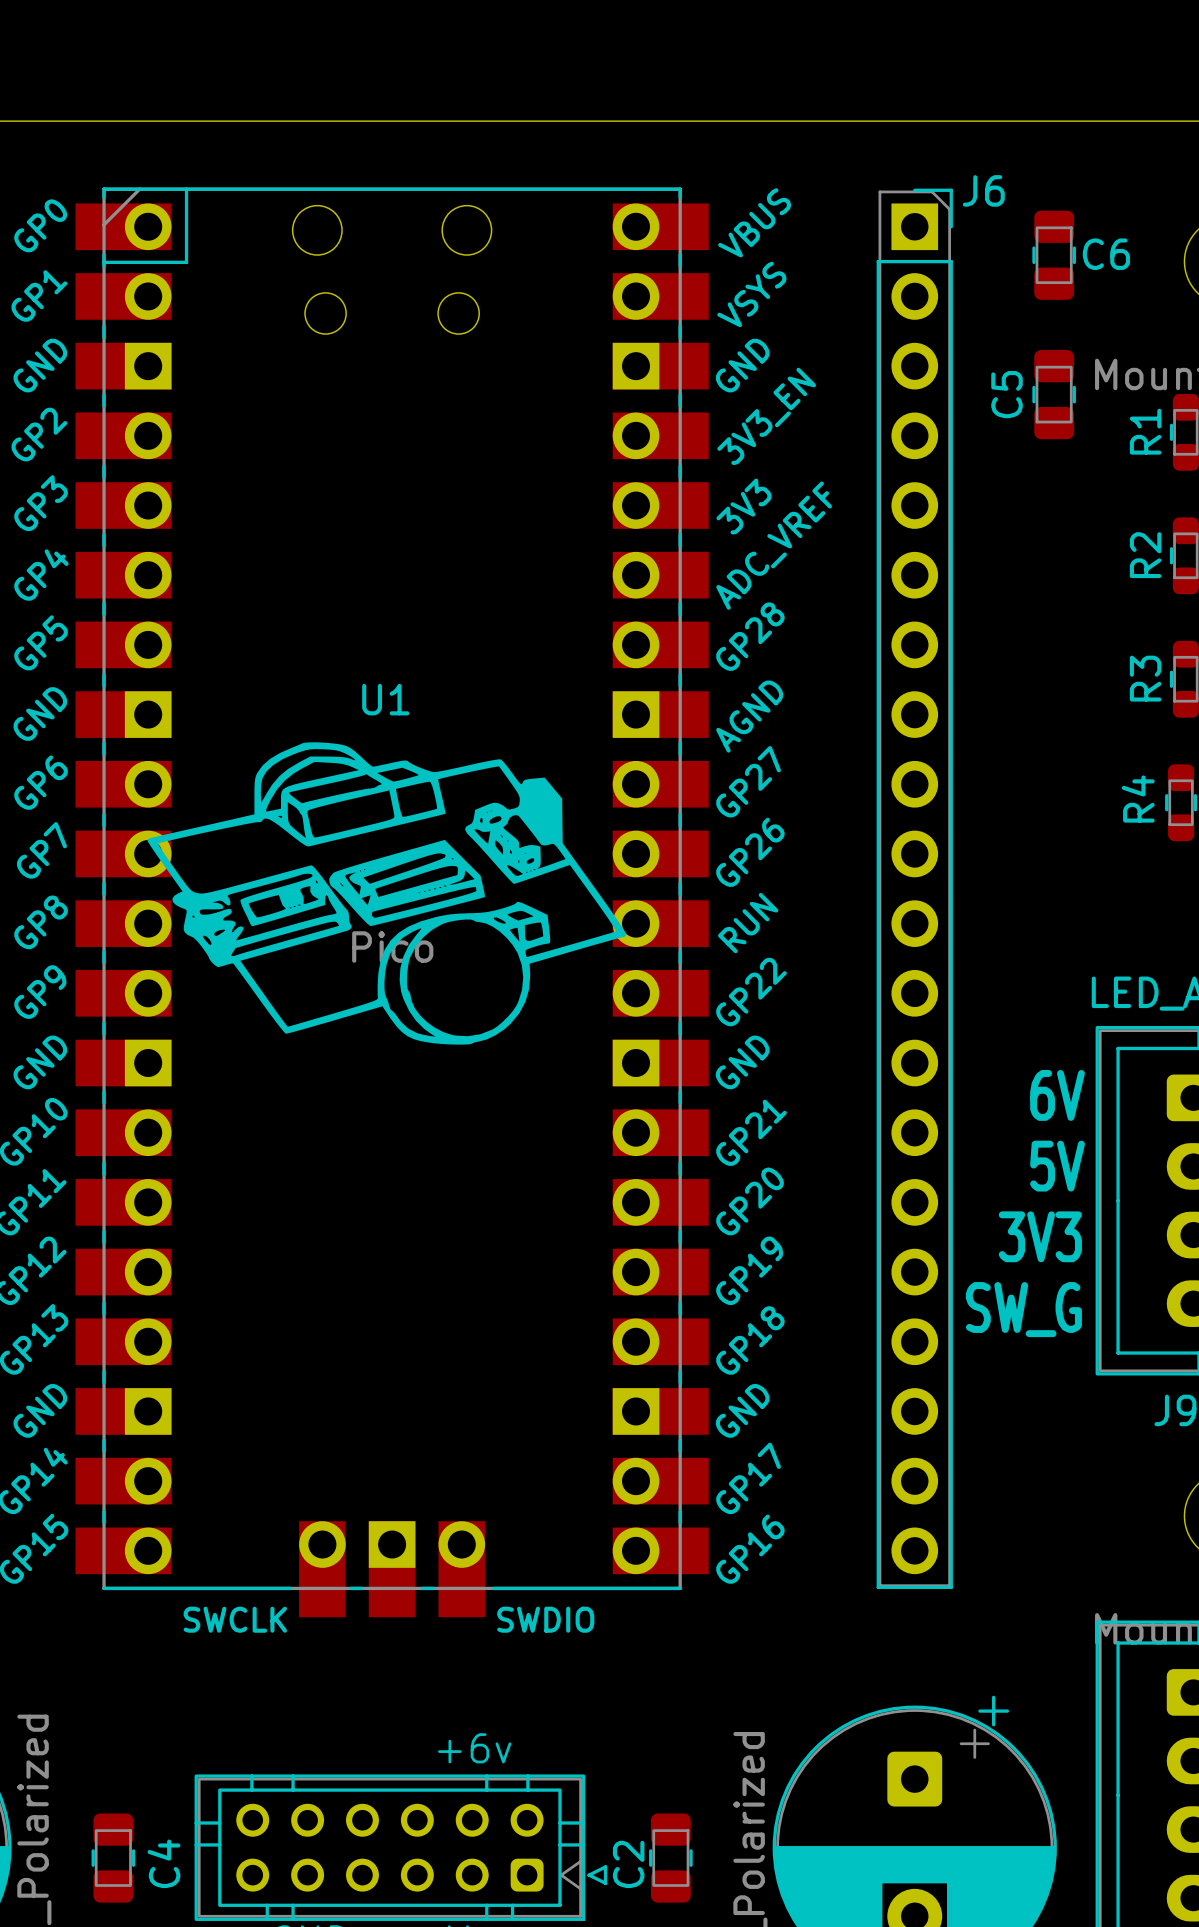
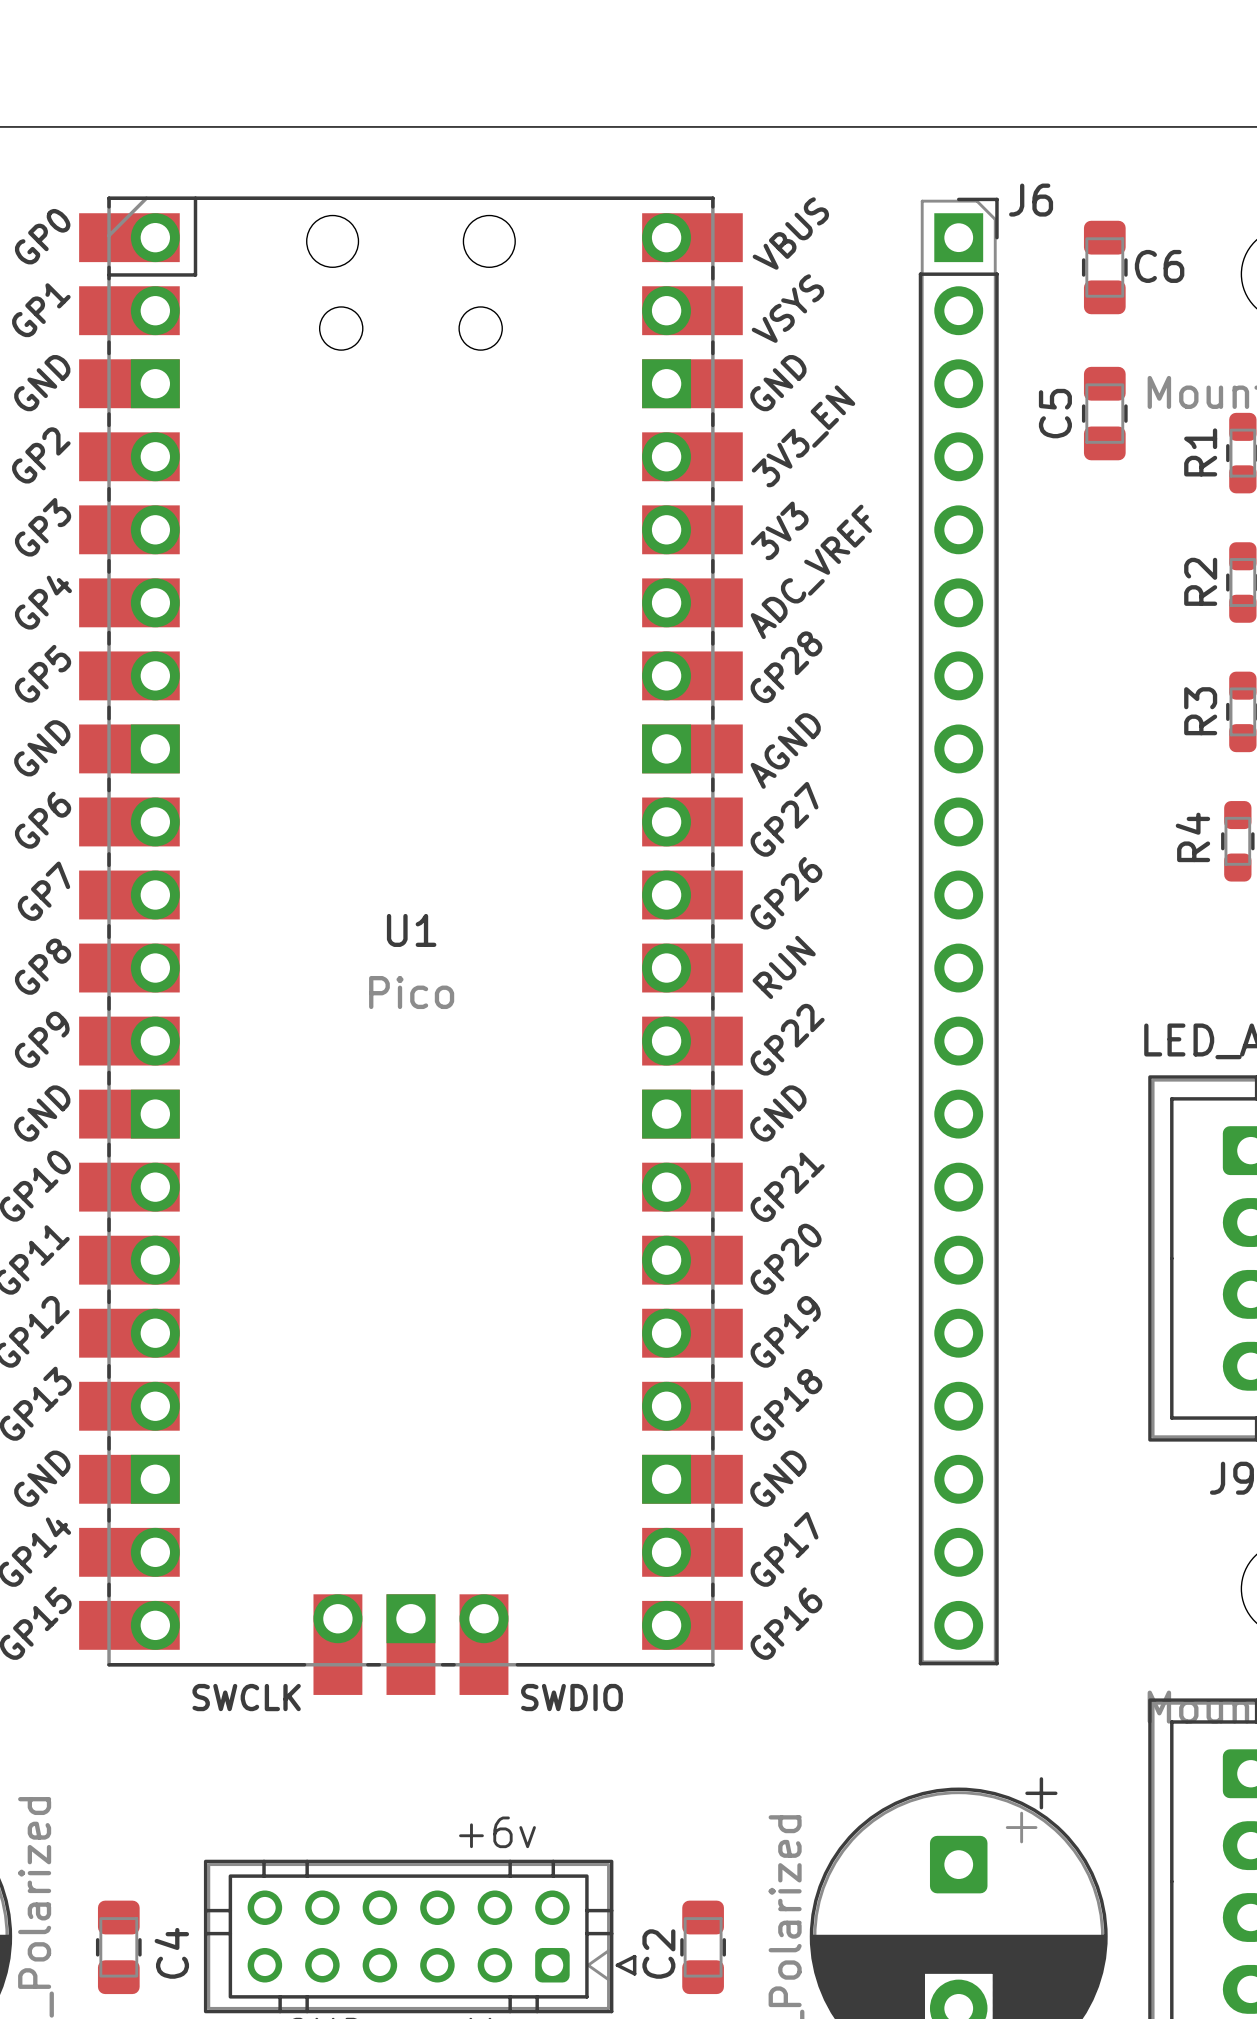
U1 name position: U1 (385, 699) -> U1 (411, 930)
drawing: [147, 742, 627, 1045] -> none
text: 6V (1057, 1095) -> none
text: 5V (1057, 1166) -> none
text: 3V3 (1040, 1236) -> none
text: SW_G (1023, 1309) -> none

